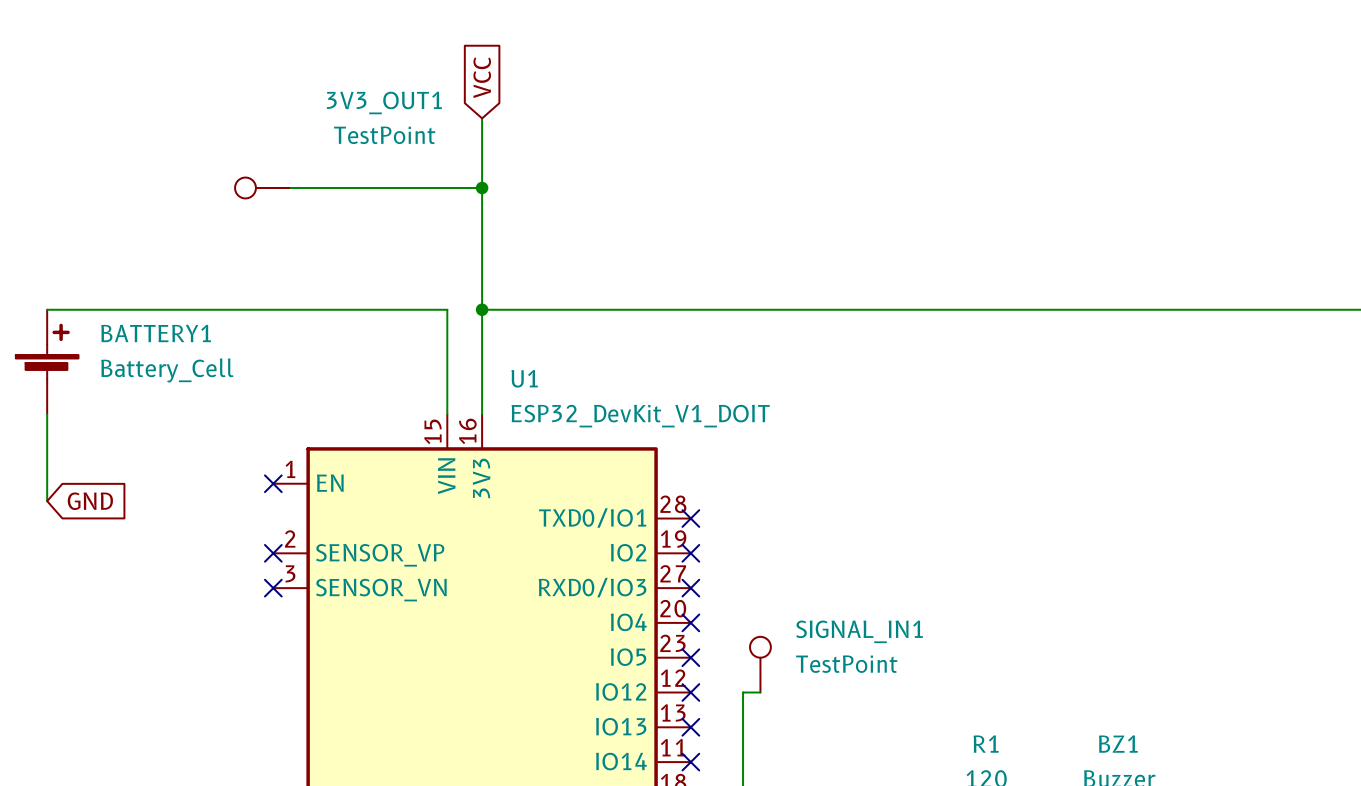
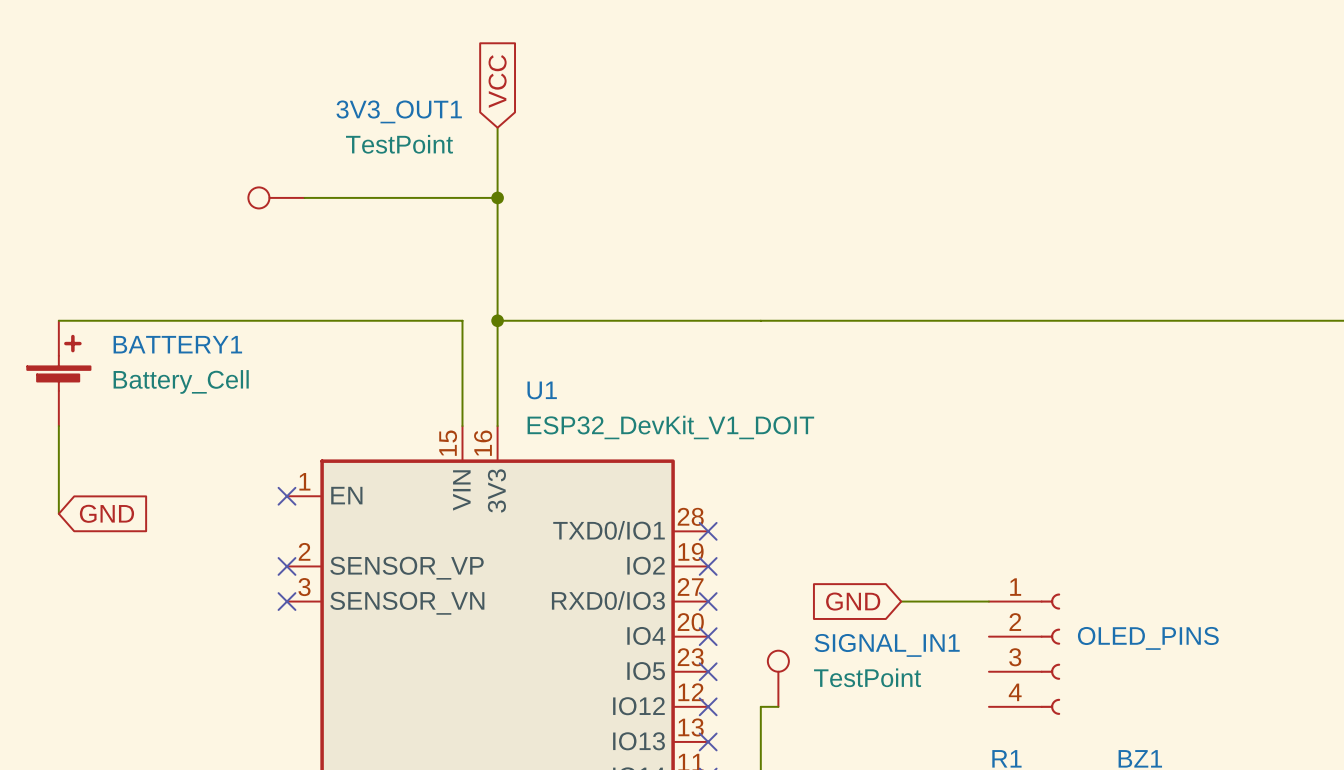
global label: none -> GND (853, 601)
wire: none -> (901, 601) (988, 601)
OLED_PINS: none -> (1024, 654)

